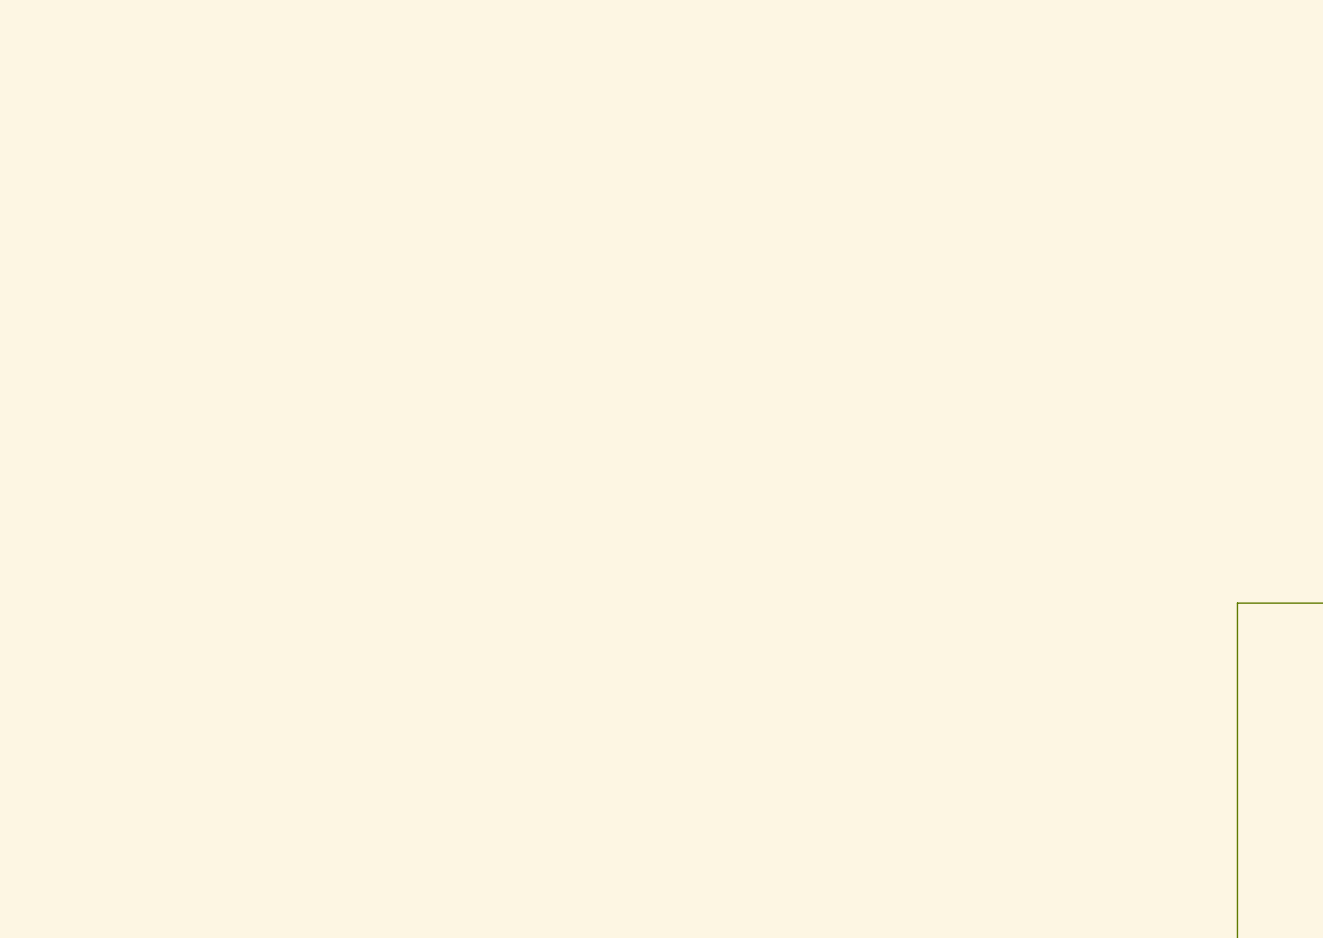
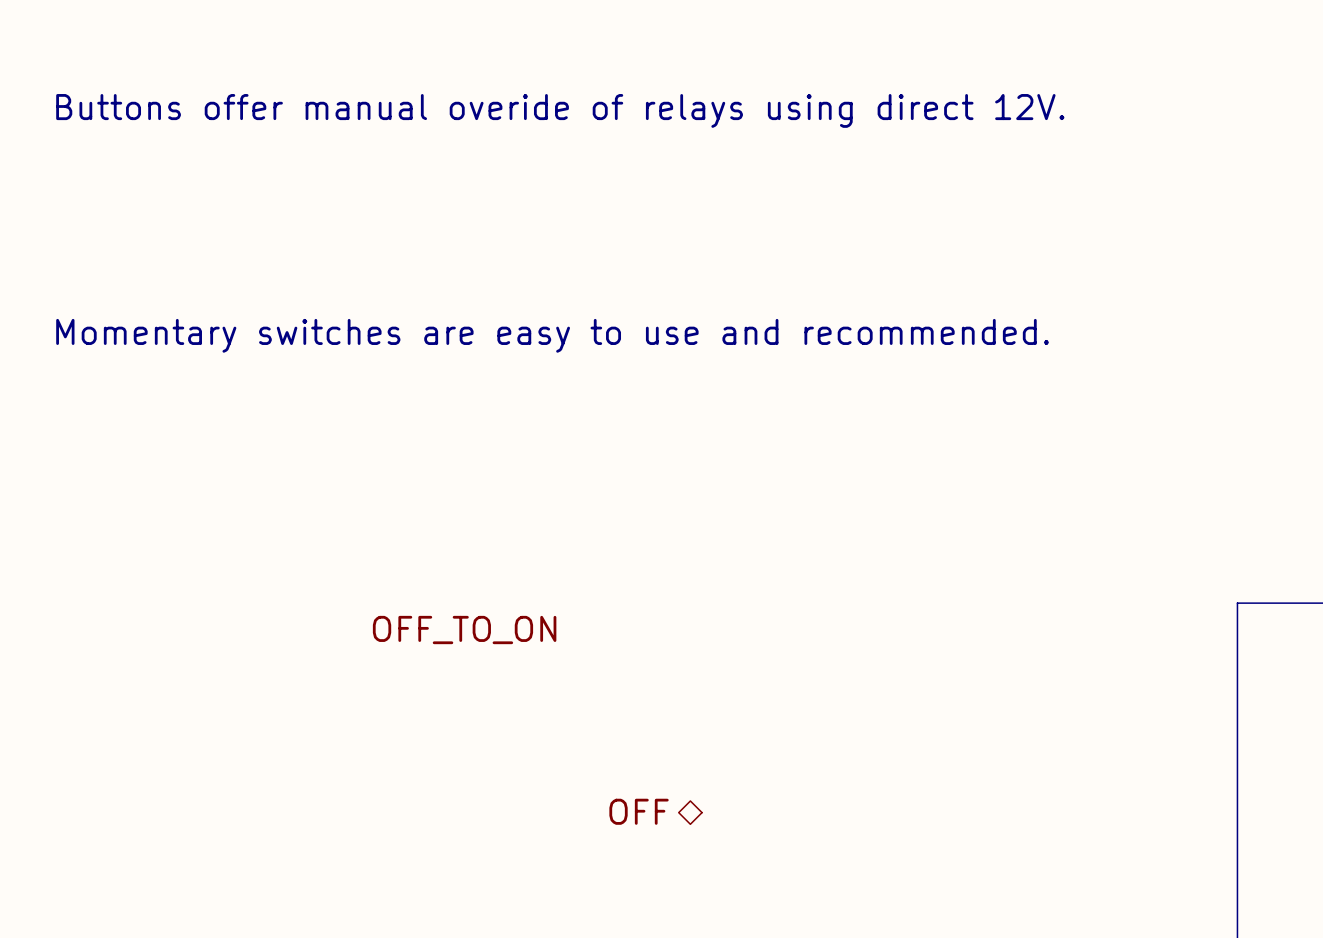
text: none -> Buttons offer manual overide of relays using direct 12V. (560, 110)
text: none -> Momentary switches are easy to use and recommended. (552, 335)
label: none -> OFF_TO_ON (464, 630)
hierarchical label: none -> OFF (639, 811)

